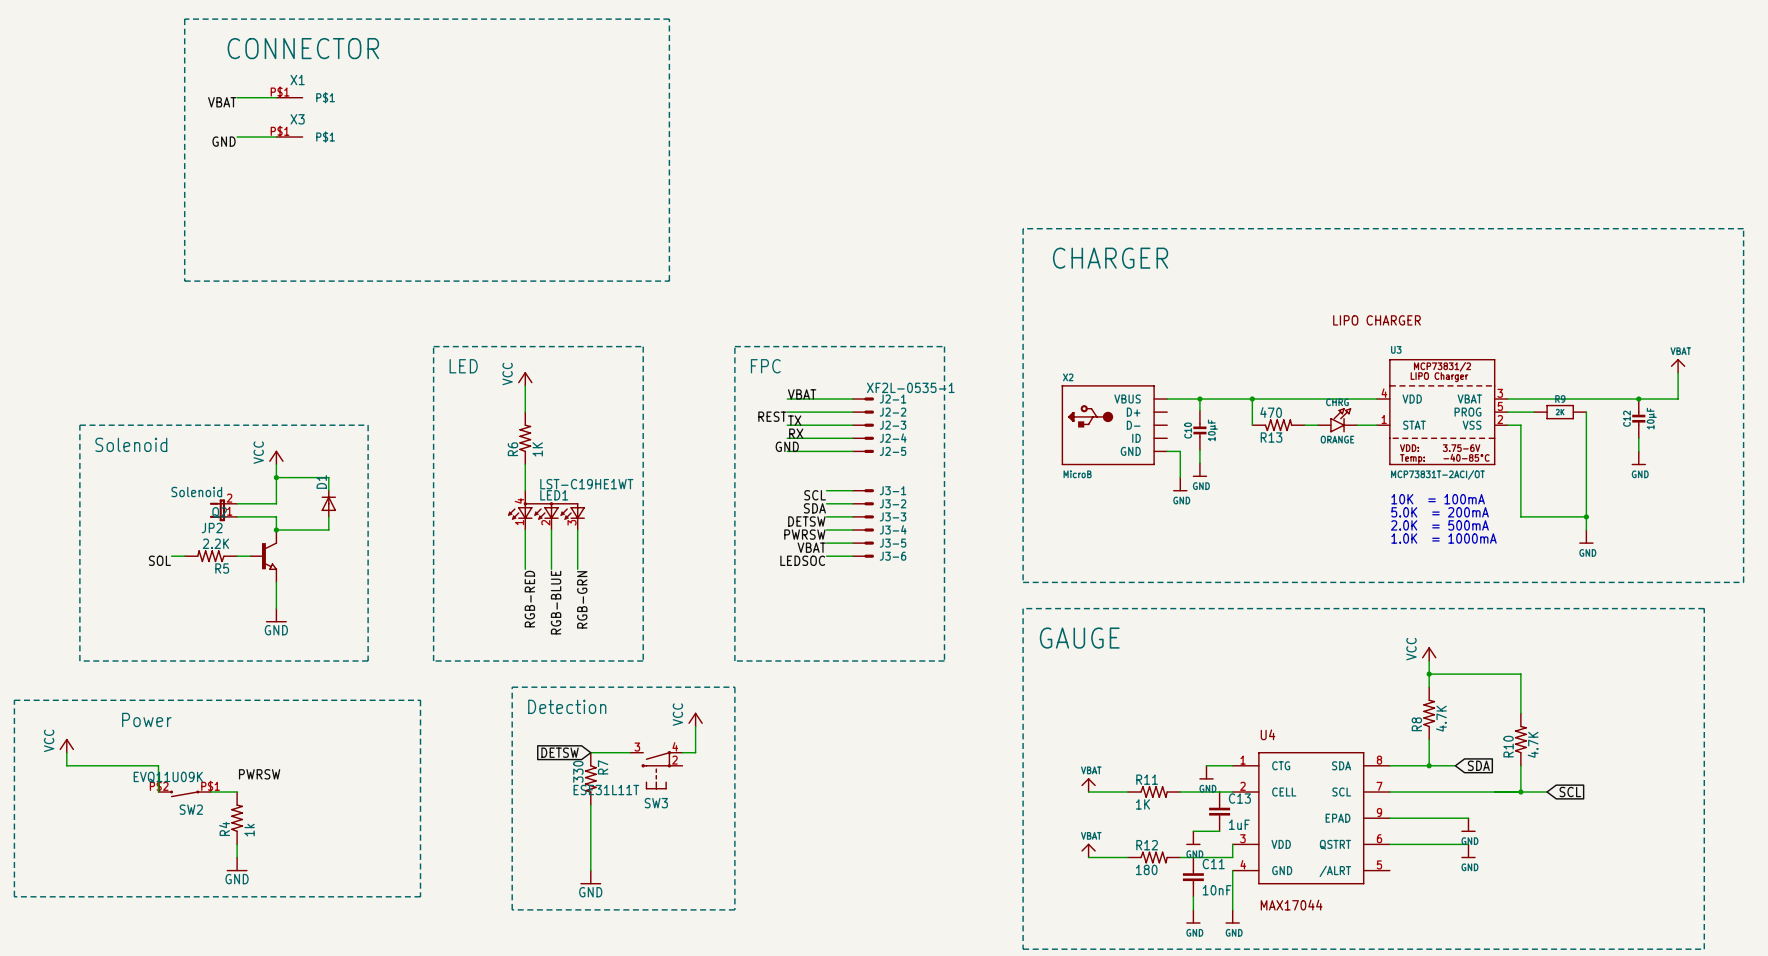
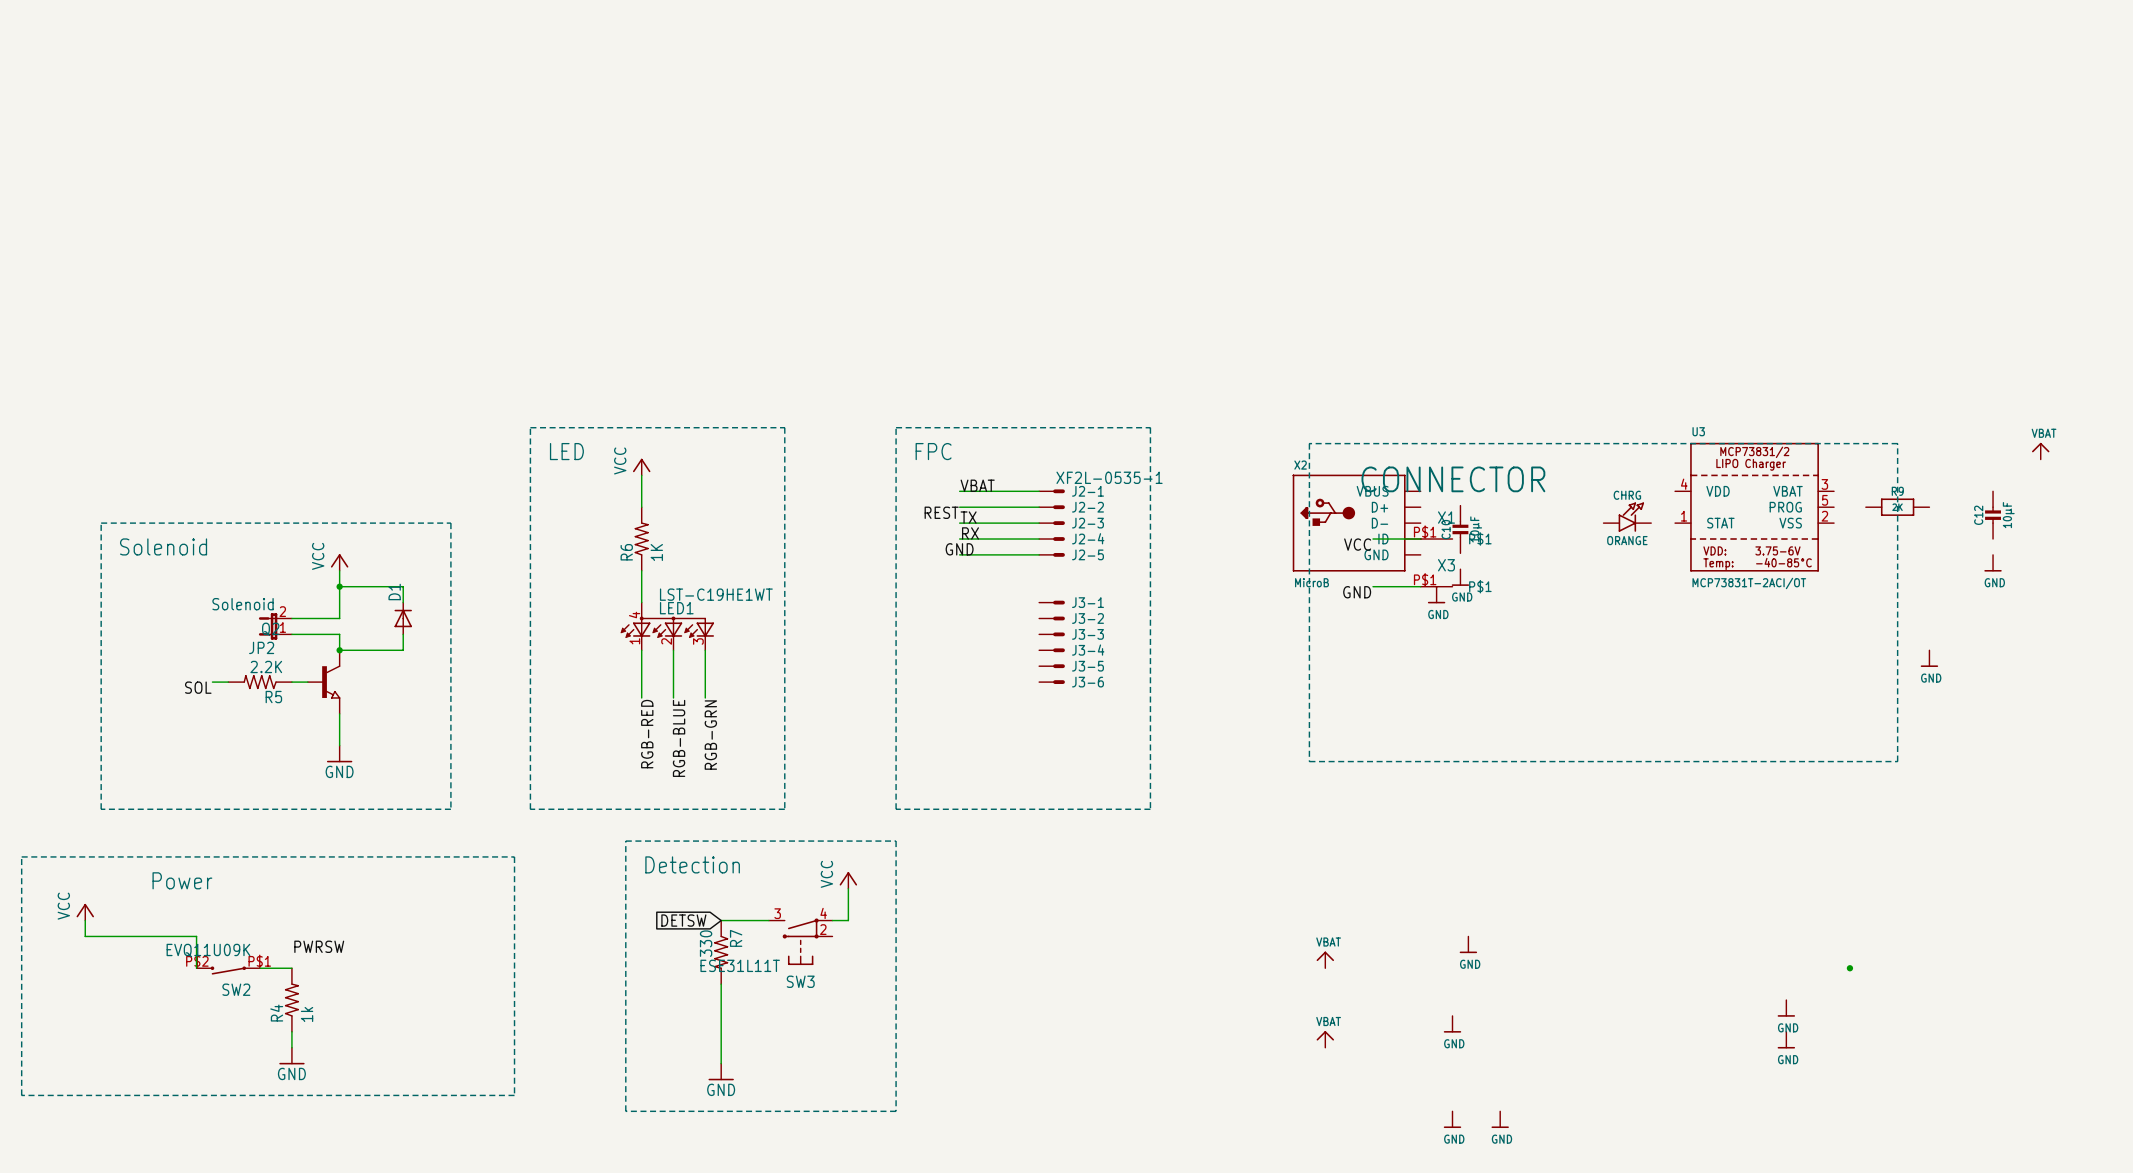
line: (184, 19) (184, 281) (669, 281) (669, 19) (184, 19) -> none
text: CONNECTOR (303, 48) -> none
wire: (237, 97) (276, 97) -> none
X1 position: (289, 97) -> (1436, 539)
label: VBAT (222, 102) -> none
wire: (237, 137) (276, 137) -> none
X3 position: (289, 137) -> (1436, 586)
label: GND (224, 141) -> none
line: (1023, 228) (1023, 582) (1743, 582) (1743, 228) (1023, 228) -> none
text: CHARGER (1110, 258) -> none
text: LIPO CHARGER (1376, 320) -> none
line: none -> (1309, 443) (1309, 761) (1897, 761) (1897, 443) (1309, 443)
wire: (1678, 372) (1678, 399) (1507, 399) -> none
text: none -> CONNECTOR (1453, 479)
wire: (1167, 399) (1376, 399) -> none
wire: (1199, 399) (1199, 410) -> none
junction: (1199, 399) -> none
wire: (1252, 399) (1252, 425) -> none
junction: (1252, 399) -> none
junction: (1638, 399) -> none
wire: (1507, 412) (1533, 412) -> none
wire: (1586, 412) (1586, 530) -> none
R13: 470 (1278, 425) -> none
wire: (1304, 425) (1317, 425) -> none
wire: (1357, 425) (1376, 425) -> none
wire: (1507, 425) (1520, 425) (1520, 516) (1586, 516) -> none
wire: none -> (1373, 539) (1420, 539)
wire: (1638, 438) (1638, 451) -> none
label: none -> VCC (1357, 544)
wire: (1199, 450) (1199, 463) -> none
wire: (1167, 451) (1180, 451) (1180, 477) -> none
wire: none -> (1373, 586) (1420, 586)
label: none -> GND (1357, 592)
wire: (826, 490) (852, 490) -> none
label: SCL (815, 495) -> none
text: 10K = 100mA (1438, 499) -> none
wire: (826, 503) (852, 503) -> none
label: SDA (814, 508) -> none
text: 5.0K = 200mA (1440, 512) -> none
wire: (826, 516) (852, 516) -> none
junction: (1586, 516) -> none
label: DETSW (806, 521) -> none
text: 2.0K = 500mA (1439, 525) -> none
wire: (826, 530) (852, 530) -> none
label: PWRSW (804, 534) -> none
text: 1.0K = 1000mA (1444, 538) -> none
wire: (826, 543) (852, 543) -> none
label: VBAT (811, 547) -> none
wire: (826, 556) (852, 556) -> none
label: LEDSOC (802, 560) -> none
line: (1023, 608) (1023, 949) (1704, 949) (1704, 608) (1023, 608) -> none
text: GAUGE (1079, 638) -> none
power symbol: VCC (1429, 654) -> none
wire: (1429, 661) (1429, 687) -> none
wire: (1429, 674) (1520, 674) (1520, 713) -> none
junction: (1429, 674) -> none
R8: 4.7K (1429, 713) -> none
wire: (1429, 739) (1429, 765) -> none
R10: 4.7K (1520, 739) -> none
wire: (1206, 765) (1232, 765) -> none
wire: (1389, 765) (1455, 765) -> none
junction: (1429, 765) -> none
global label: SDA (1478, 765) -> none
wire: (1520, 765) (1520, 792) -> none
wire: (1088, 792) (1127, 792) -> none
R11: 1K (1154, 792) -> none
wire: (1180, 792) (1232, 792) -> none
wire: (1389, 792) (1547, 792) -> none
global label: SCL (1570, 792) -> none
C13: 1uF (1219, 811) -> none
U4: MAX17044 (1311, 818) -> none
wire: (1389, 818) (1468, 818) -> none
wire: (1193, 831) (1219, 831) -> none
wire: (1232, 844) (1232, 857) (1180, 857) -> none
wire: (1389, 844) (1468, 844) -> none
wire: (1088, 857) (1127, 857) -> none
R12: 180 (1154, 857) -> none
wire: (1232, 870) (1232, 909) -> none
C11: 10nF (1193, 877) -> none
wire: (1193, 896) (1193, 909) -> none

